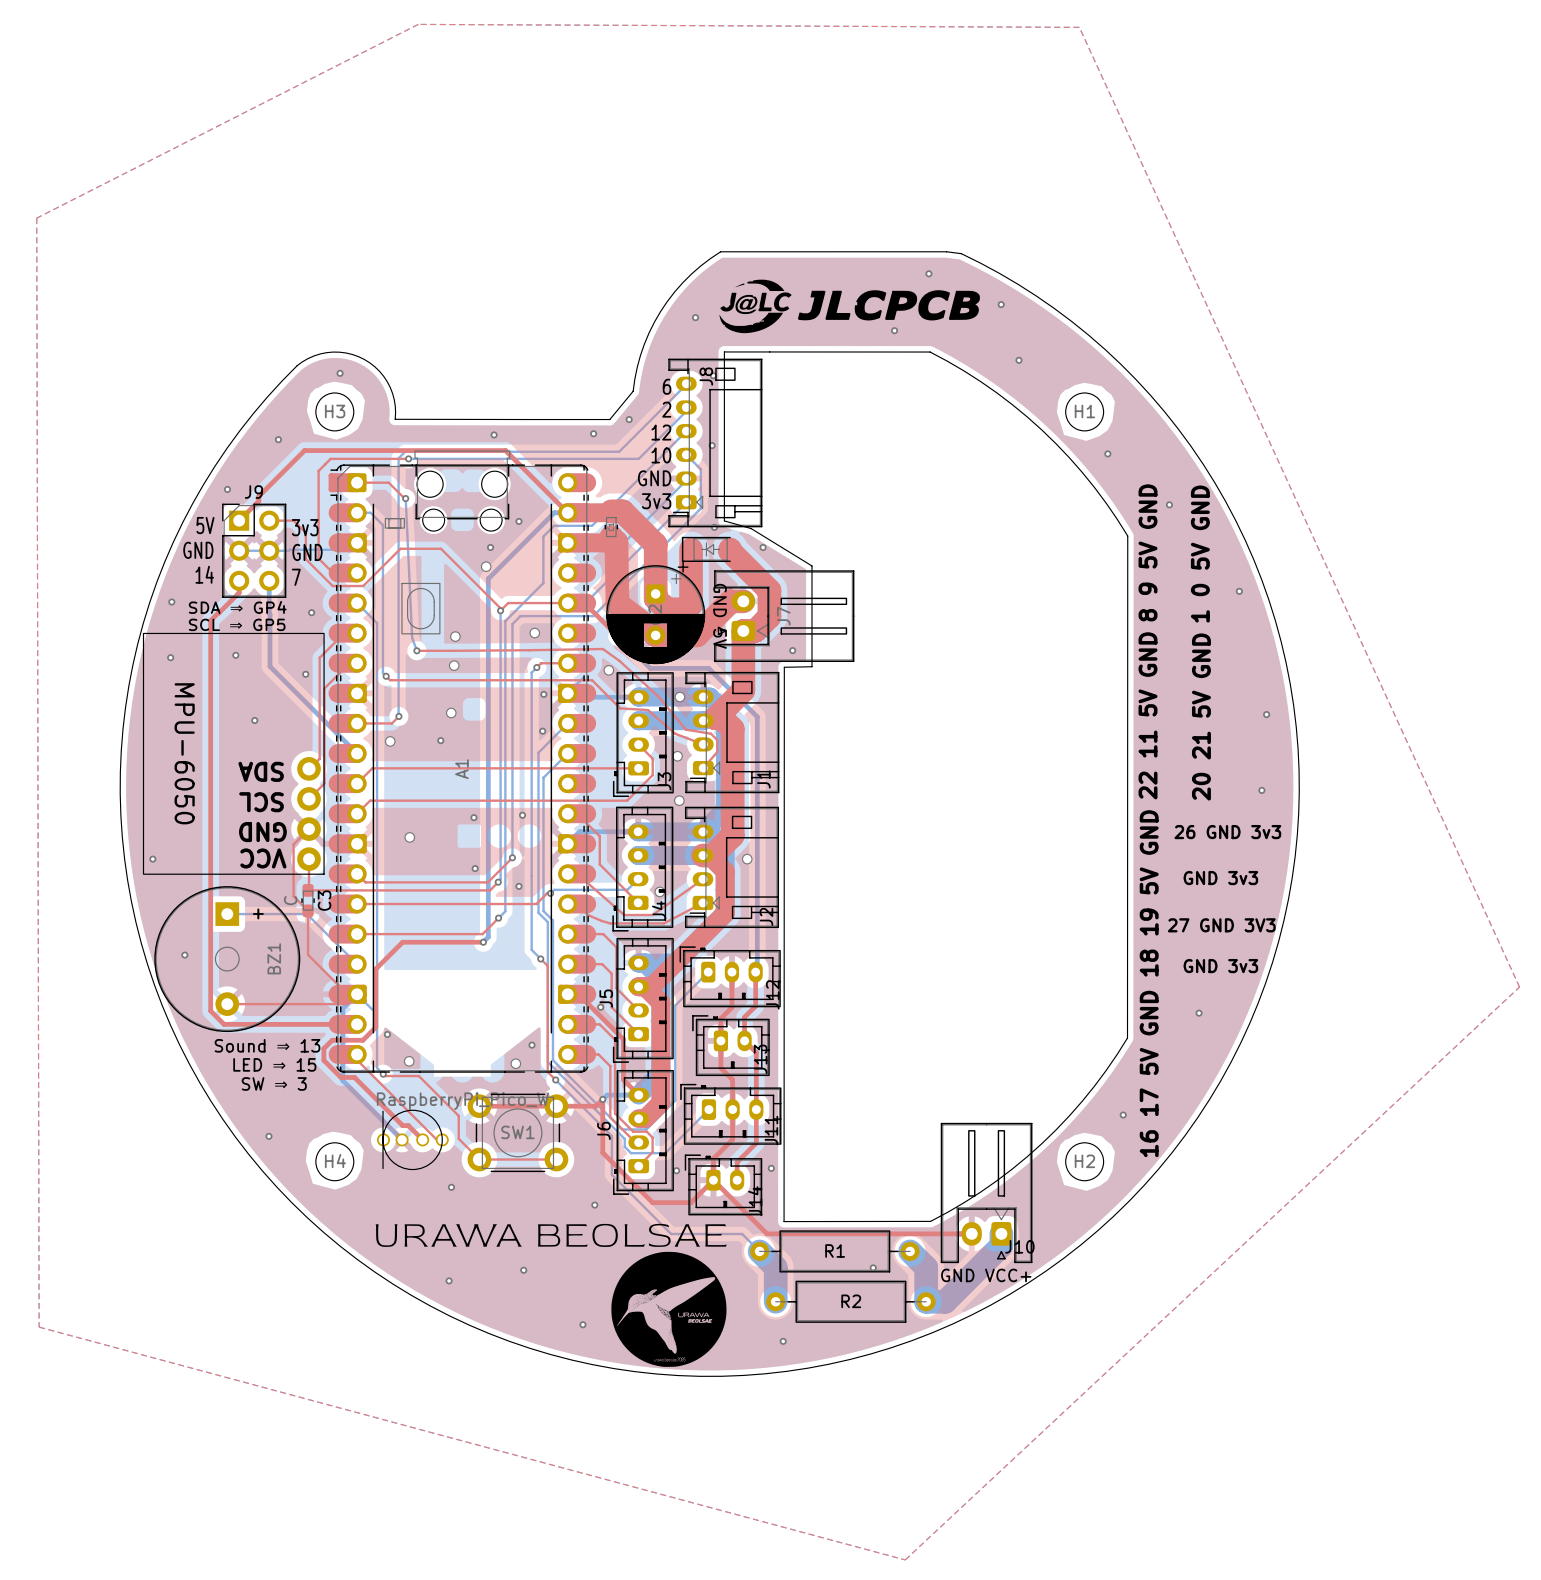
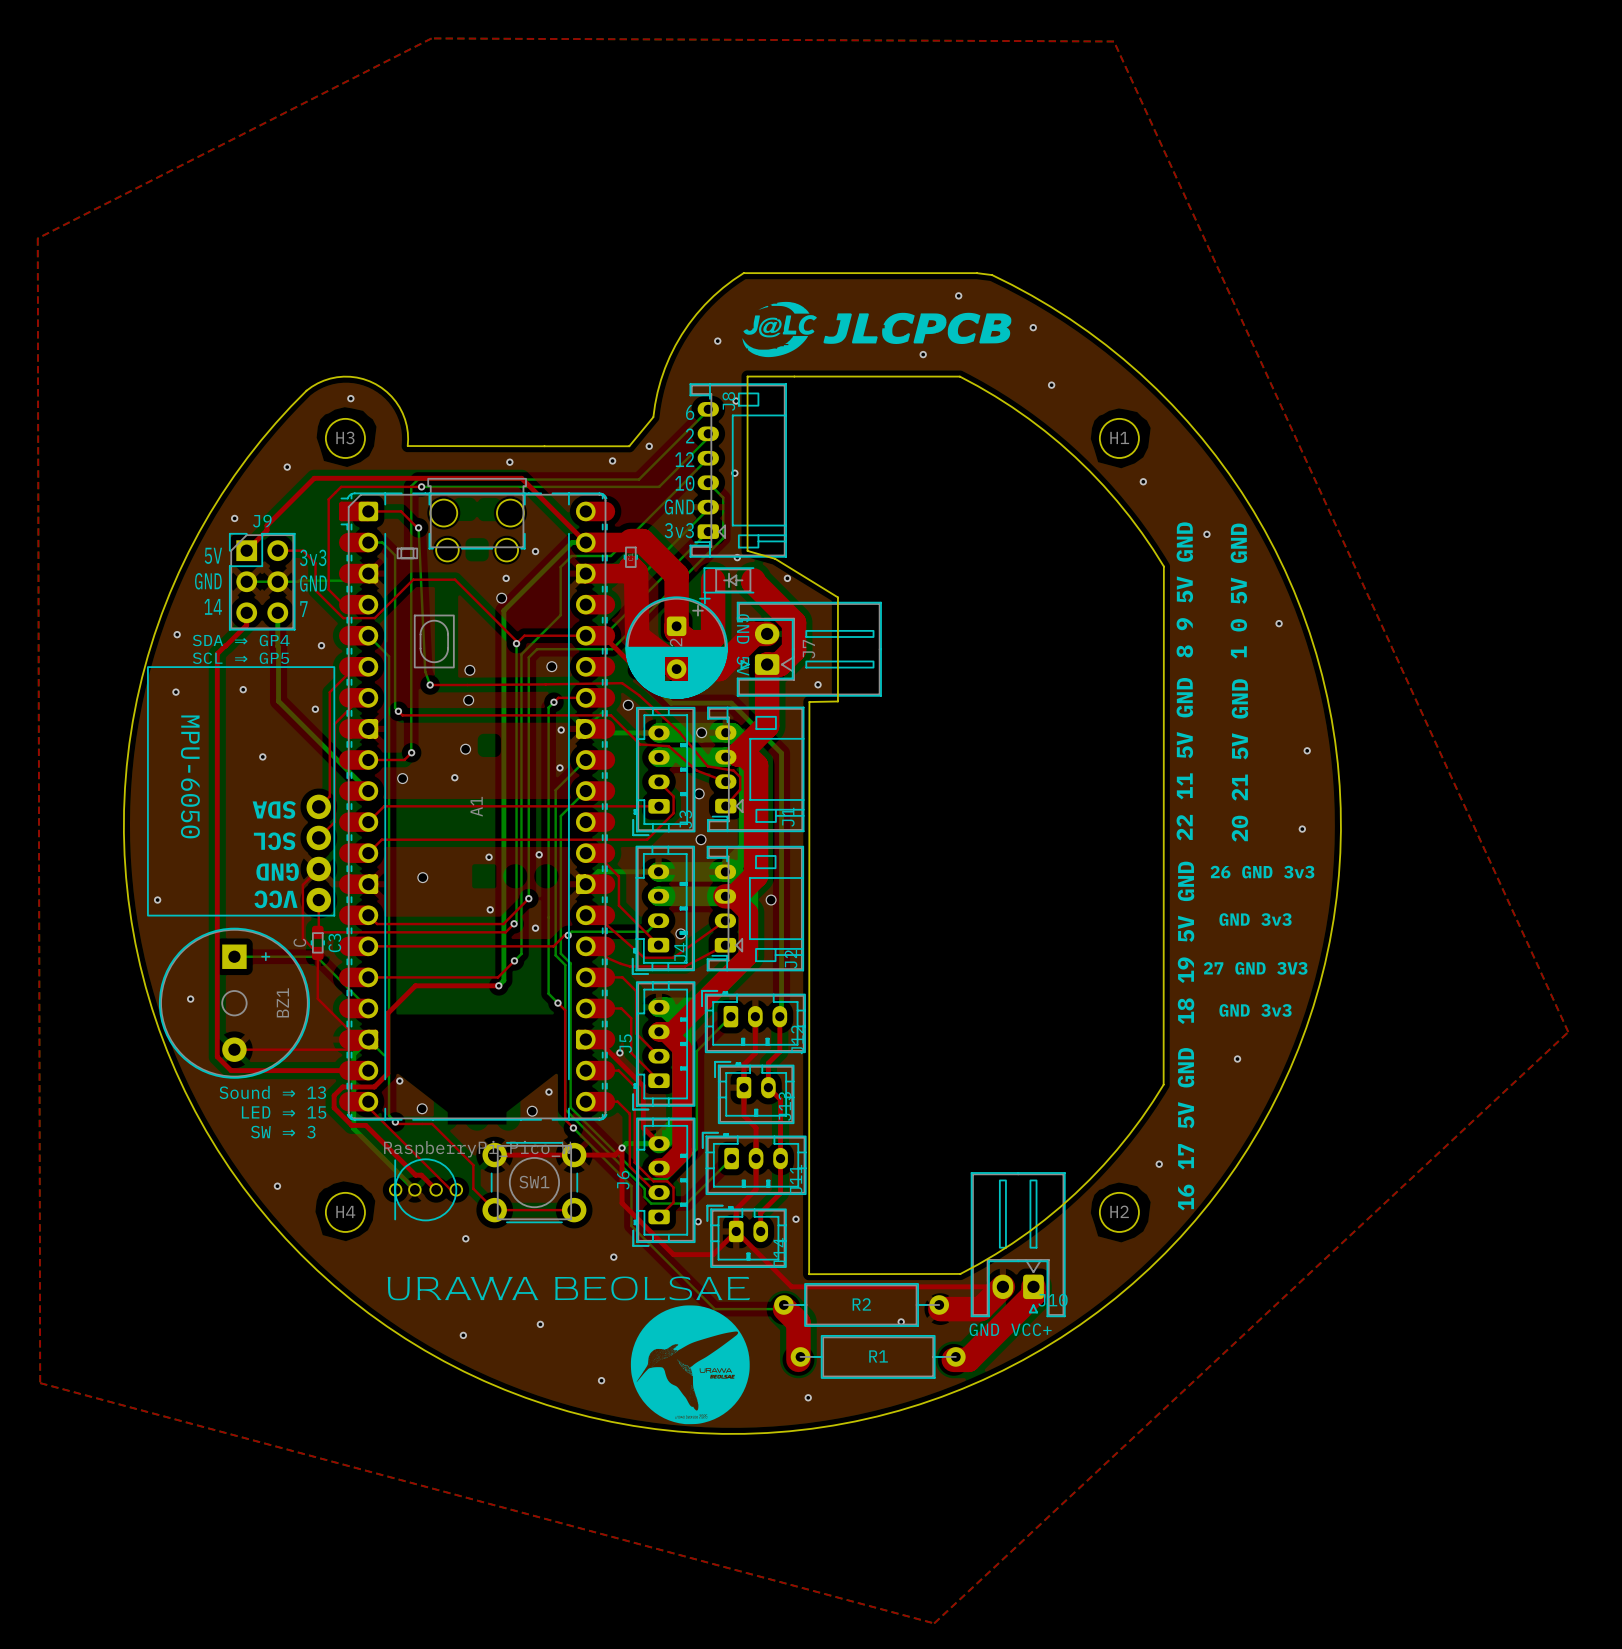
bottom track: (671, 1233) (742, 1233) (775, 1267) (775, 1301) -> (692, 1286) (714, 1309) (785, 1309)
top track: none -> (1002, 1286) (980, 1309) (940, 1309)
top track: none -> (1033, 1286) (1033, 1294) (968, 1359) (953, 1359)
bottom track: (1001, 1233) (1001, 1245) (945, 1301) (926, 1301) (926, 1267) (910, 1251) -> none
R1 name: R1 (835, 1250) -> R2 (861, 1304)
top track: none -> (785, 1309) (798, 1322) (798, 1359)
R2 name: R2 (851, 1301) -> R1 (878, 1356)

